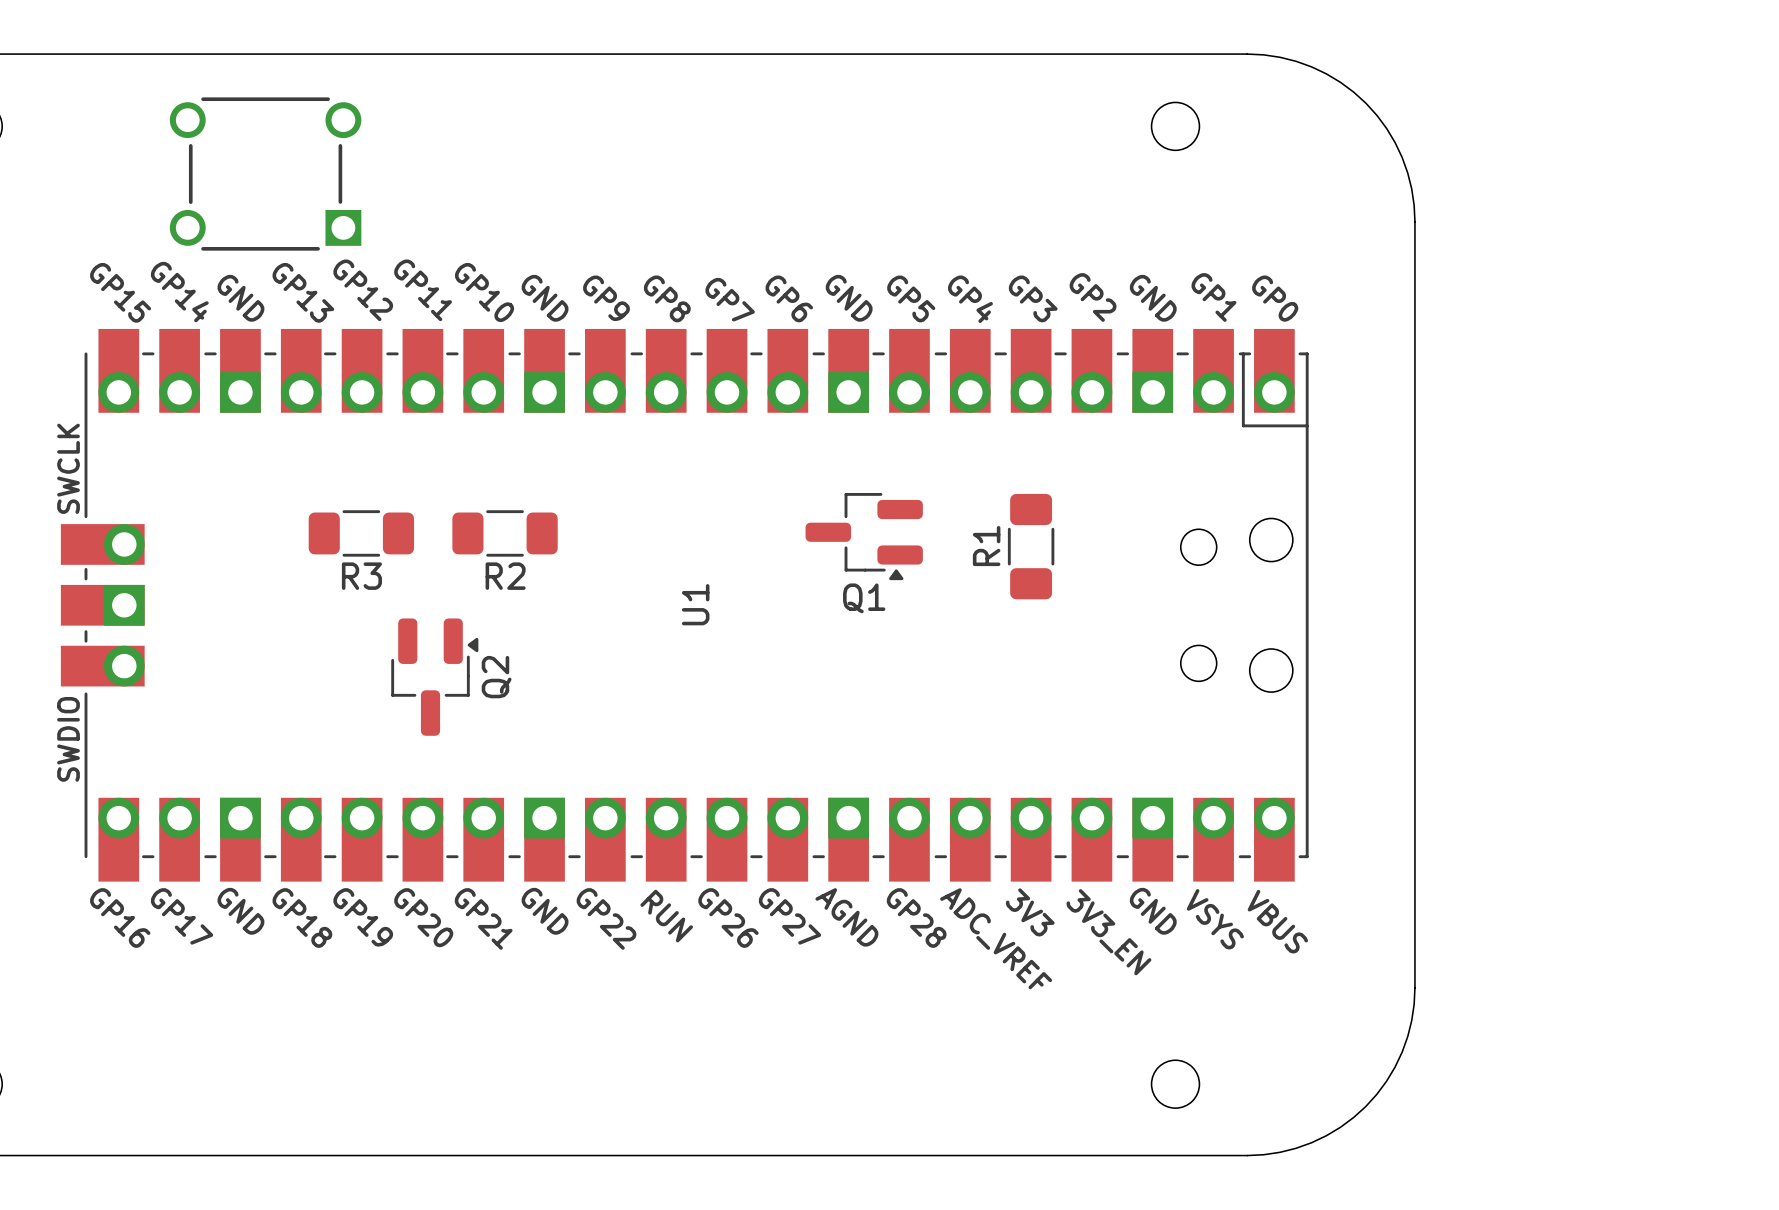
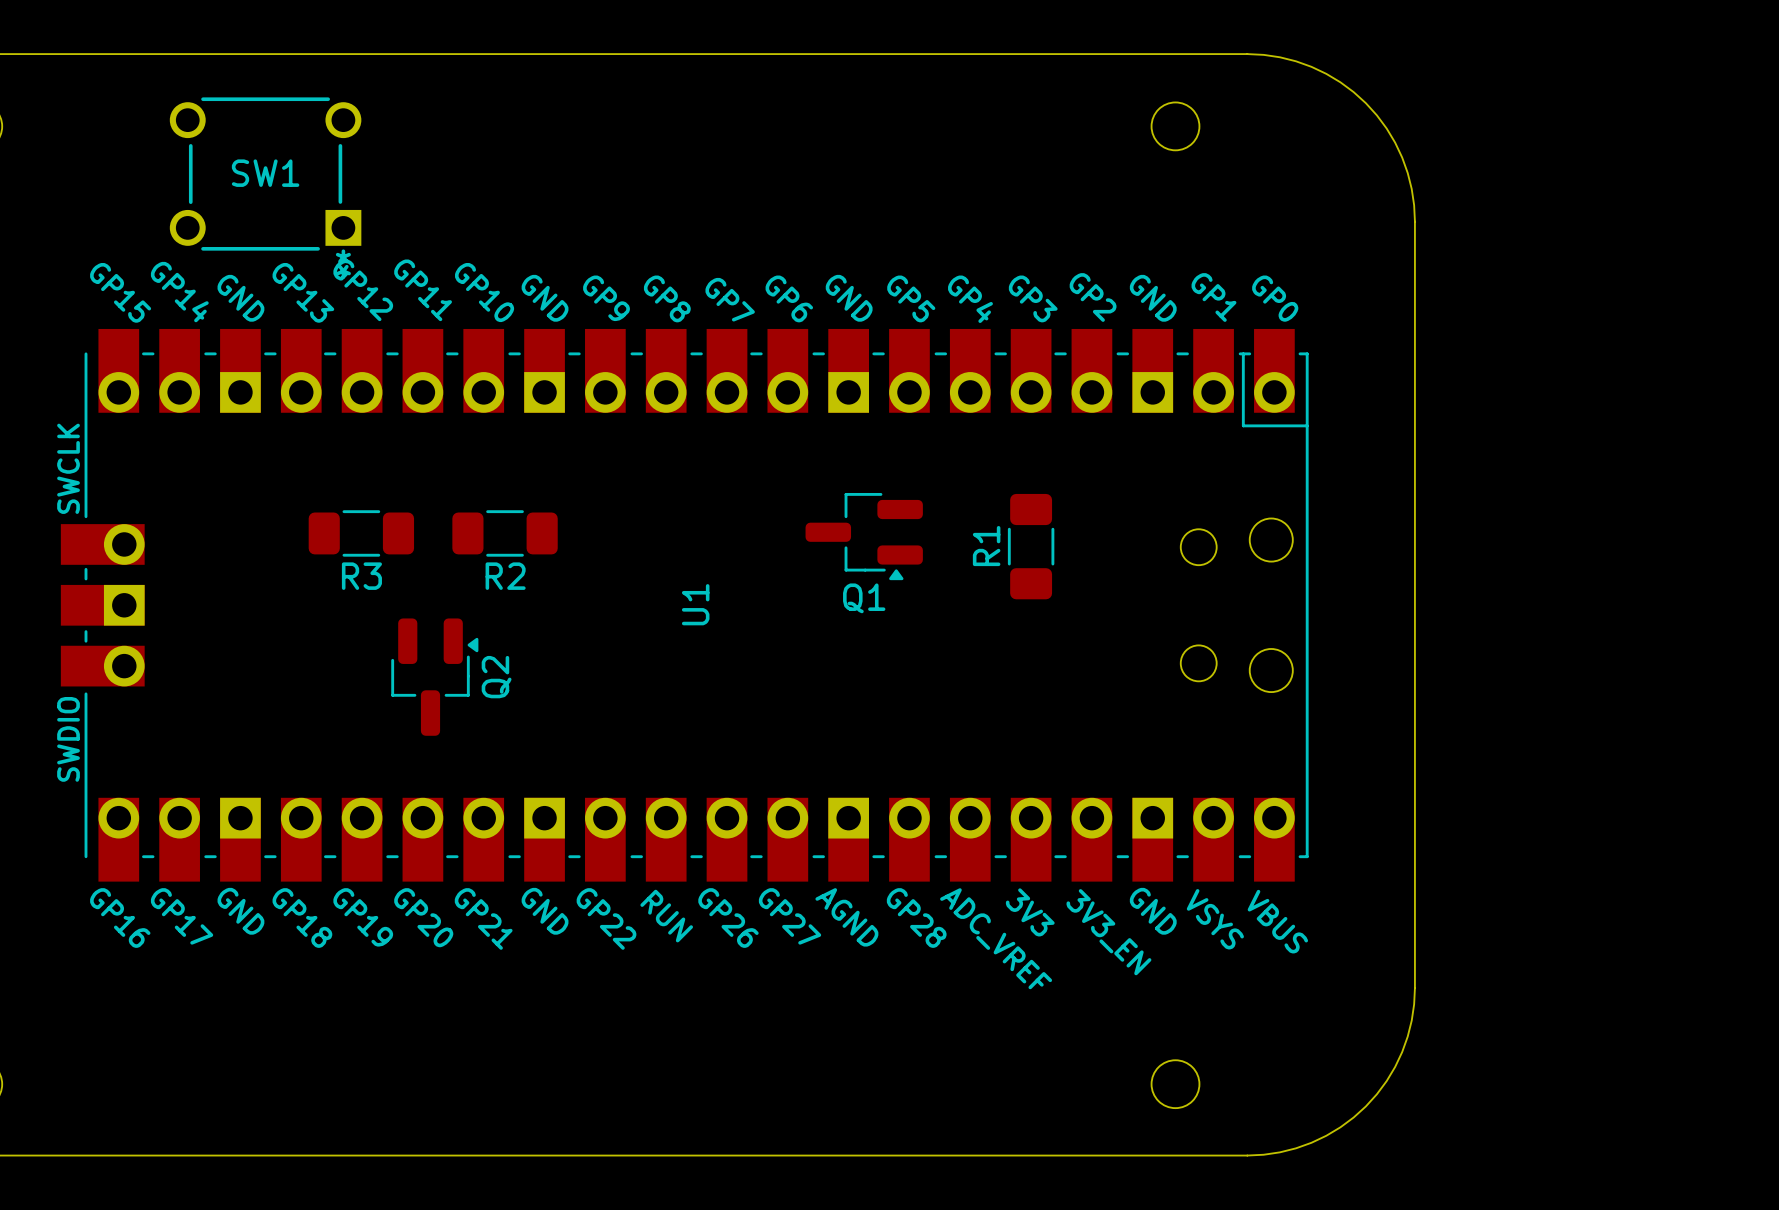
SW1 footprint: [169, 97, 362, 251] -> [169, 97, 362, 251]
SW1 name: none -> SW1 (265, 173)

